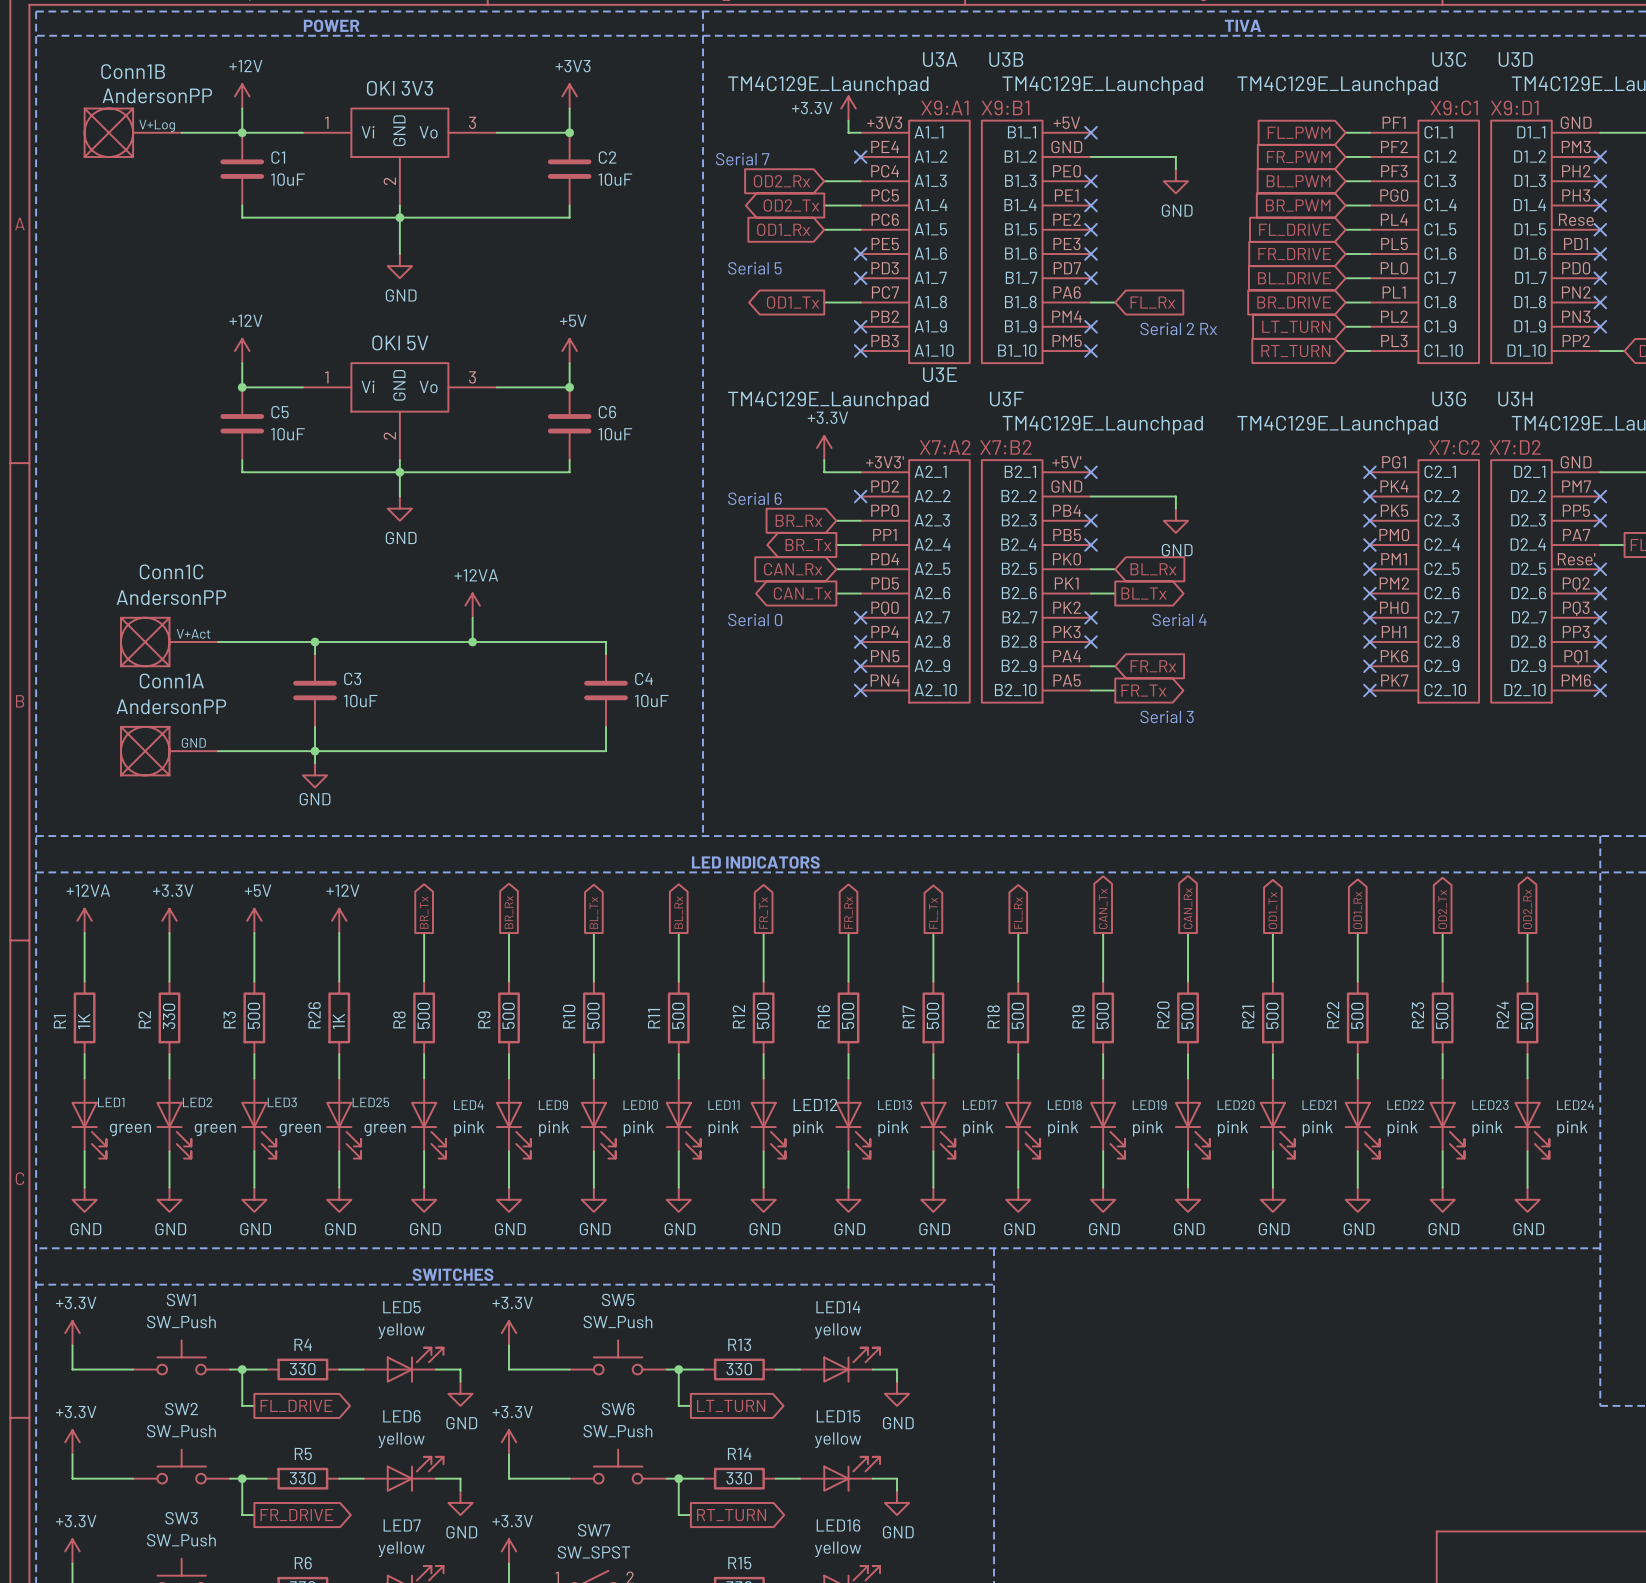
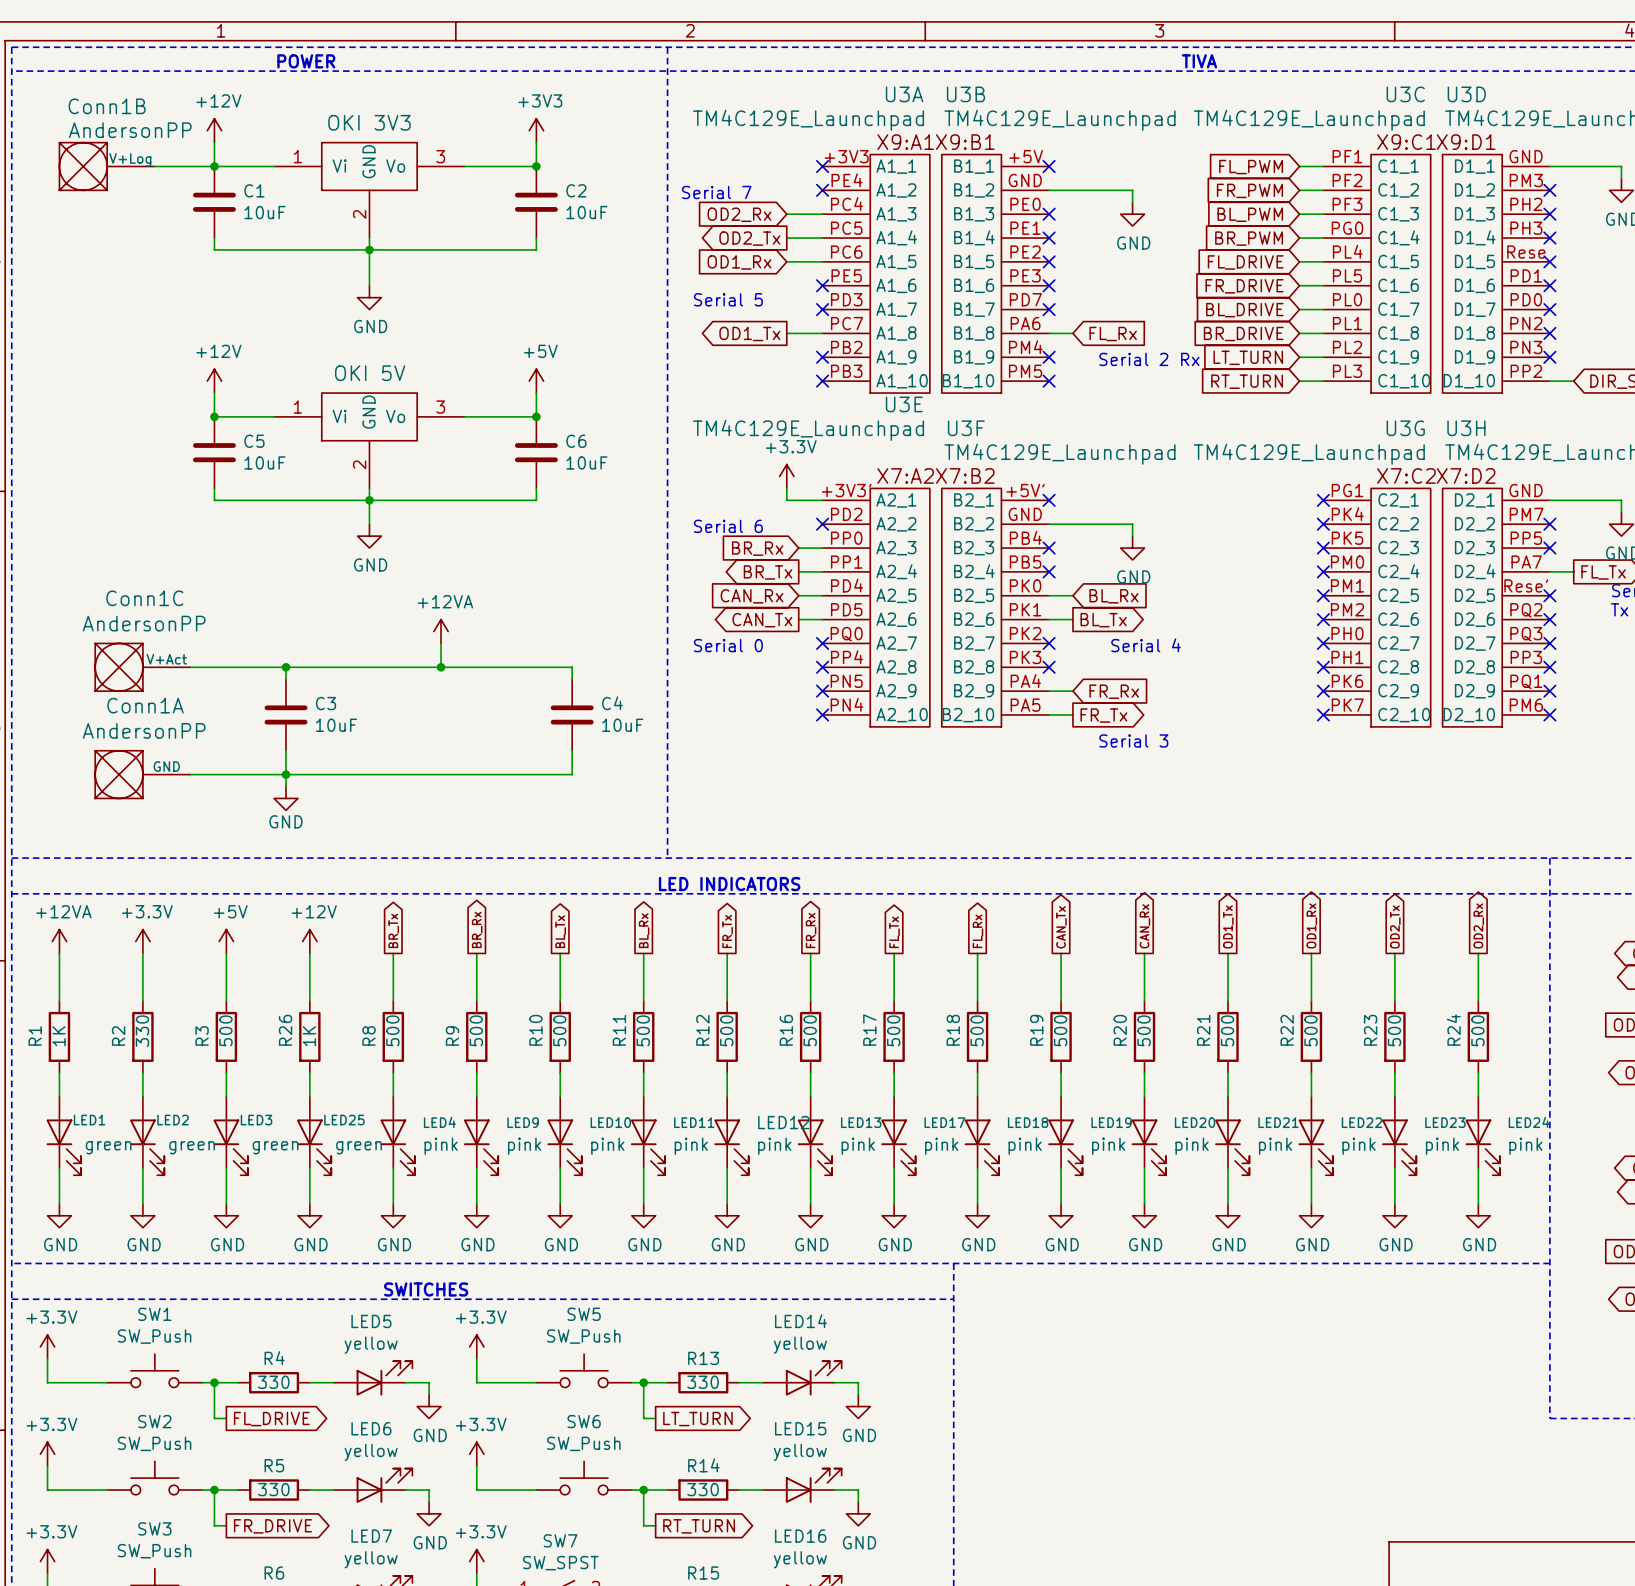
power symbol: +3.3V (848, 108) -> none
wire: (848, 120) (848, 132) (860, 132) -> none
no-connect mark: none -> (822, 166)

